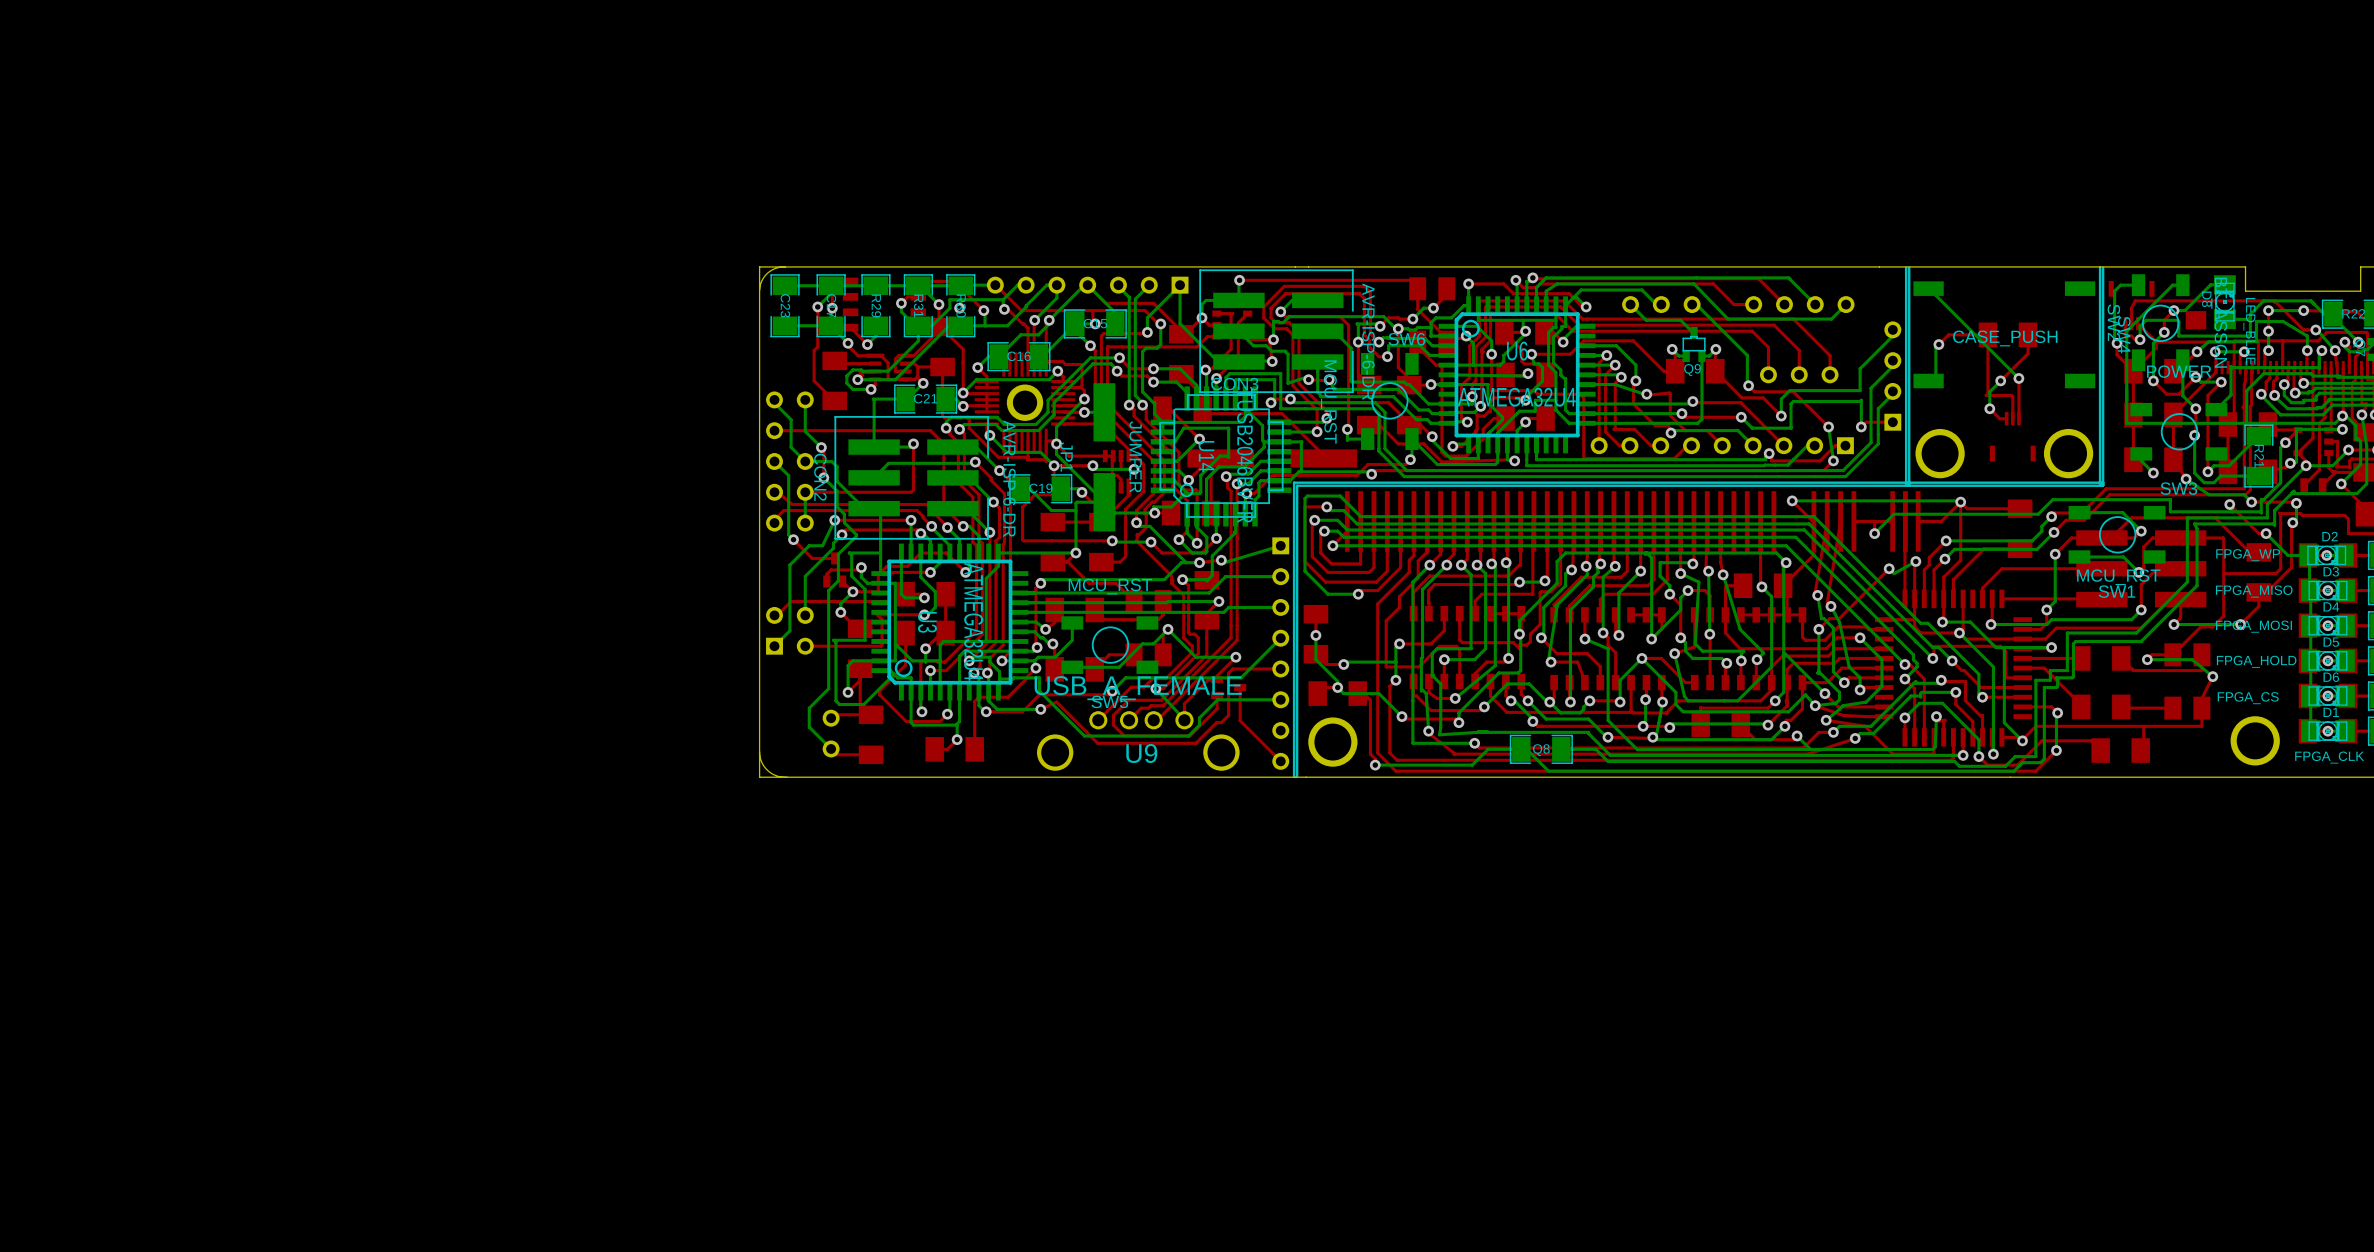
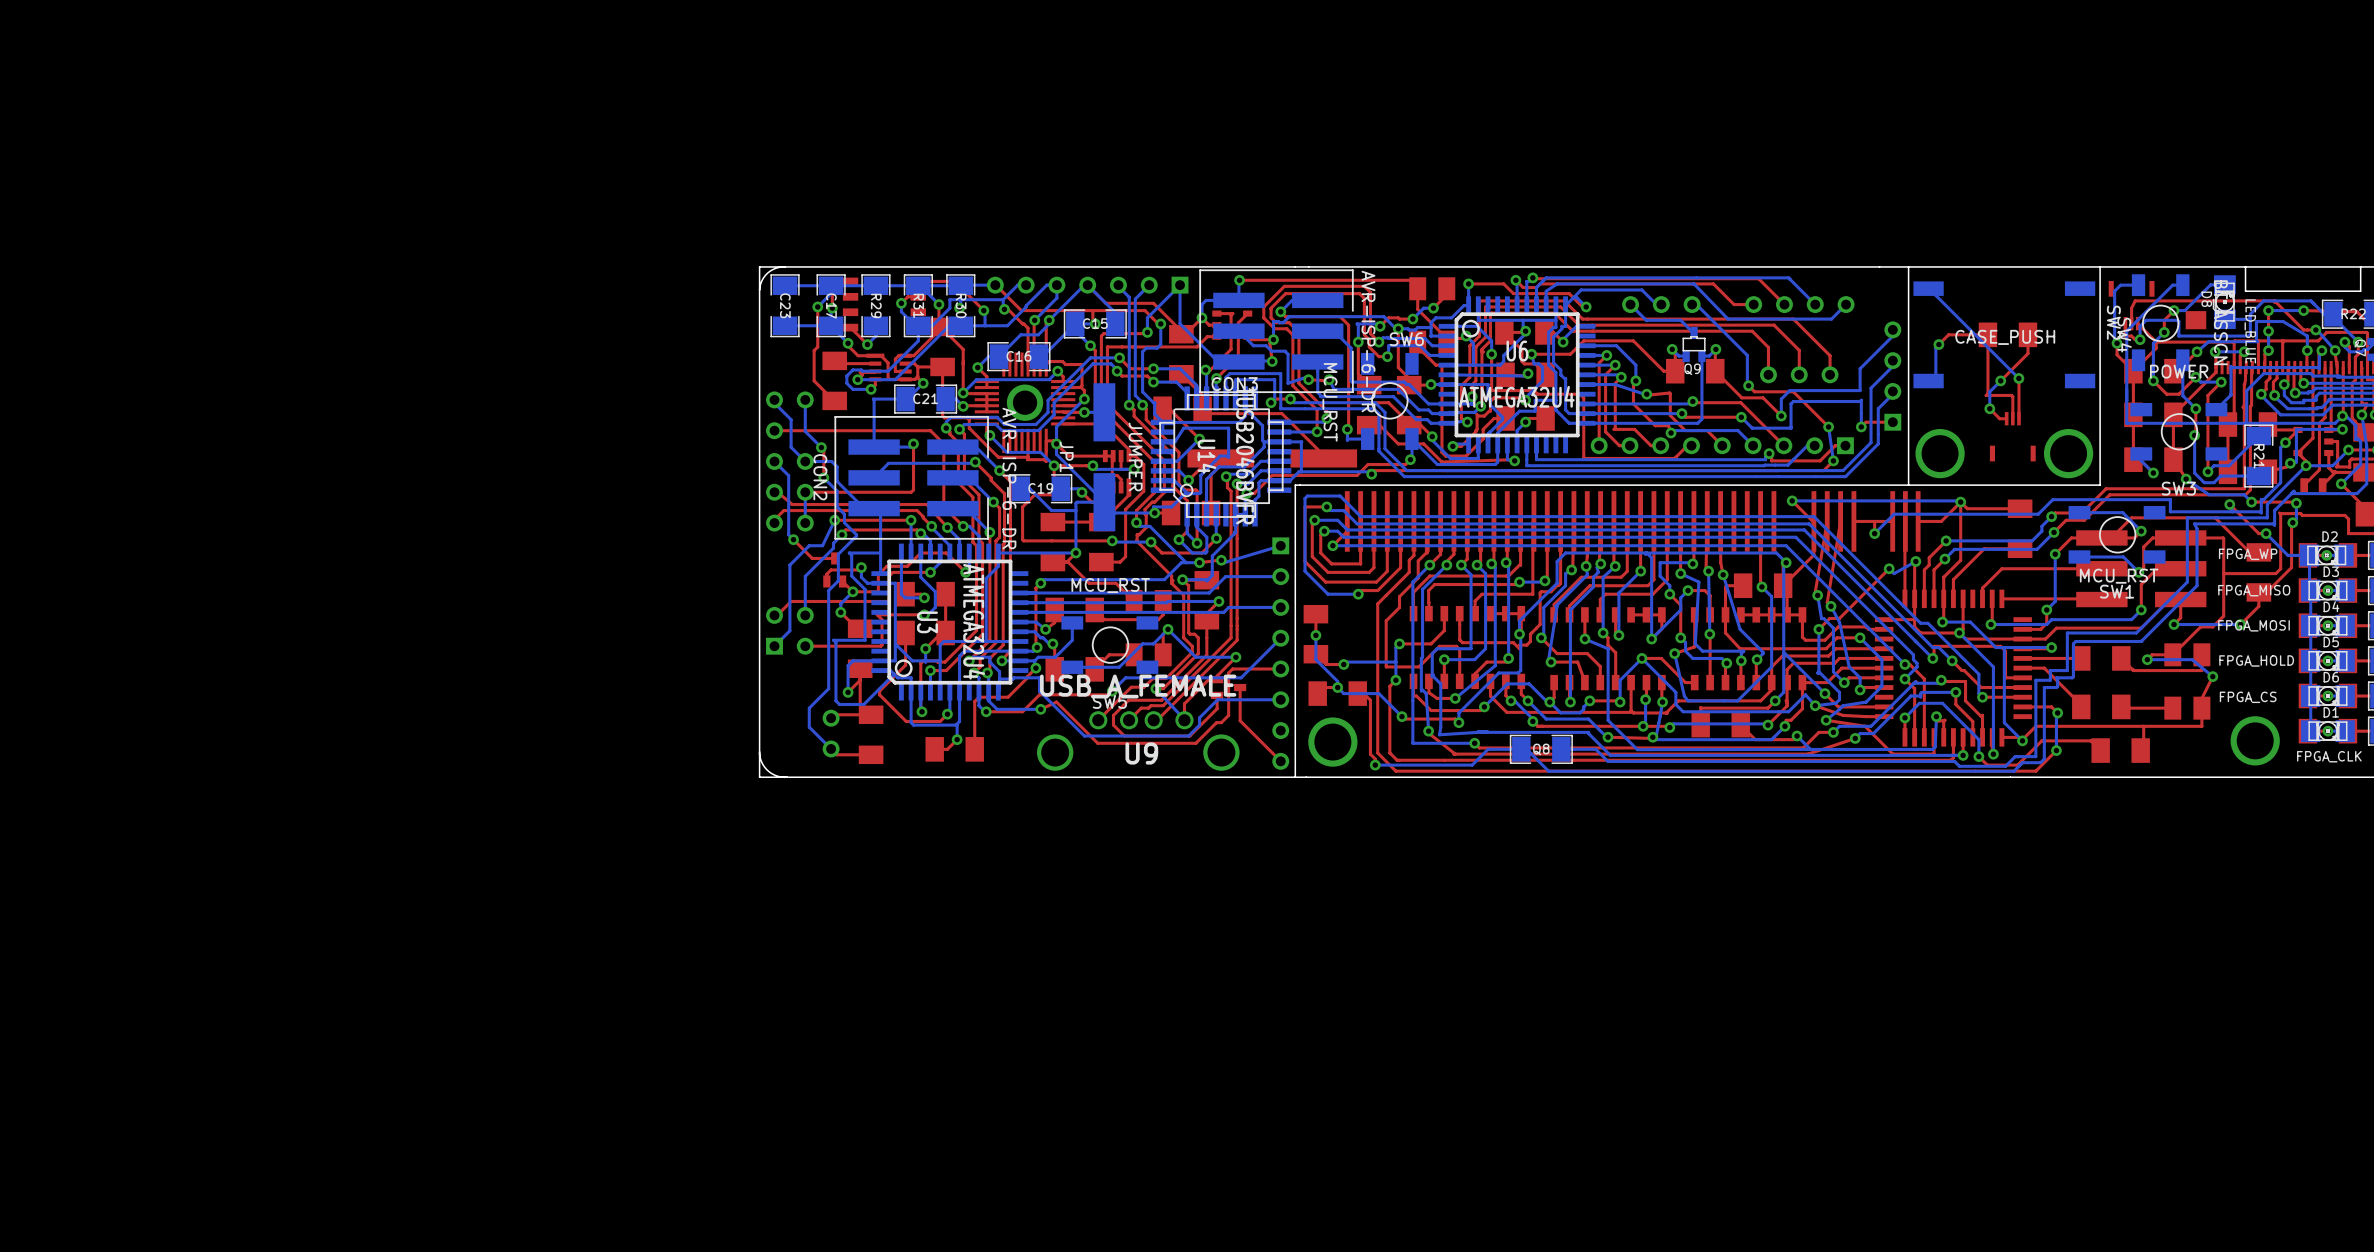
board edge: none -> (1908, 266) (1908, 485)
board edge: none -> (2100, 266) (2100, 485) (1295, 485) (1295, 777)
board edge: none -> (2360, 266) (2245, 266)
line: (1906, 267) (1906, 485) -> none
line: (1909, 267) (1909, 485) -> none
line: (2100, 267) (2100, 485) -> none
line: (2103, 267) (2103, 485) (1297, 485) (1297, 776) -> none
line: (2103, 482) (1294, 482) (1294, 776) -> none

